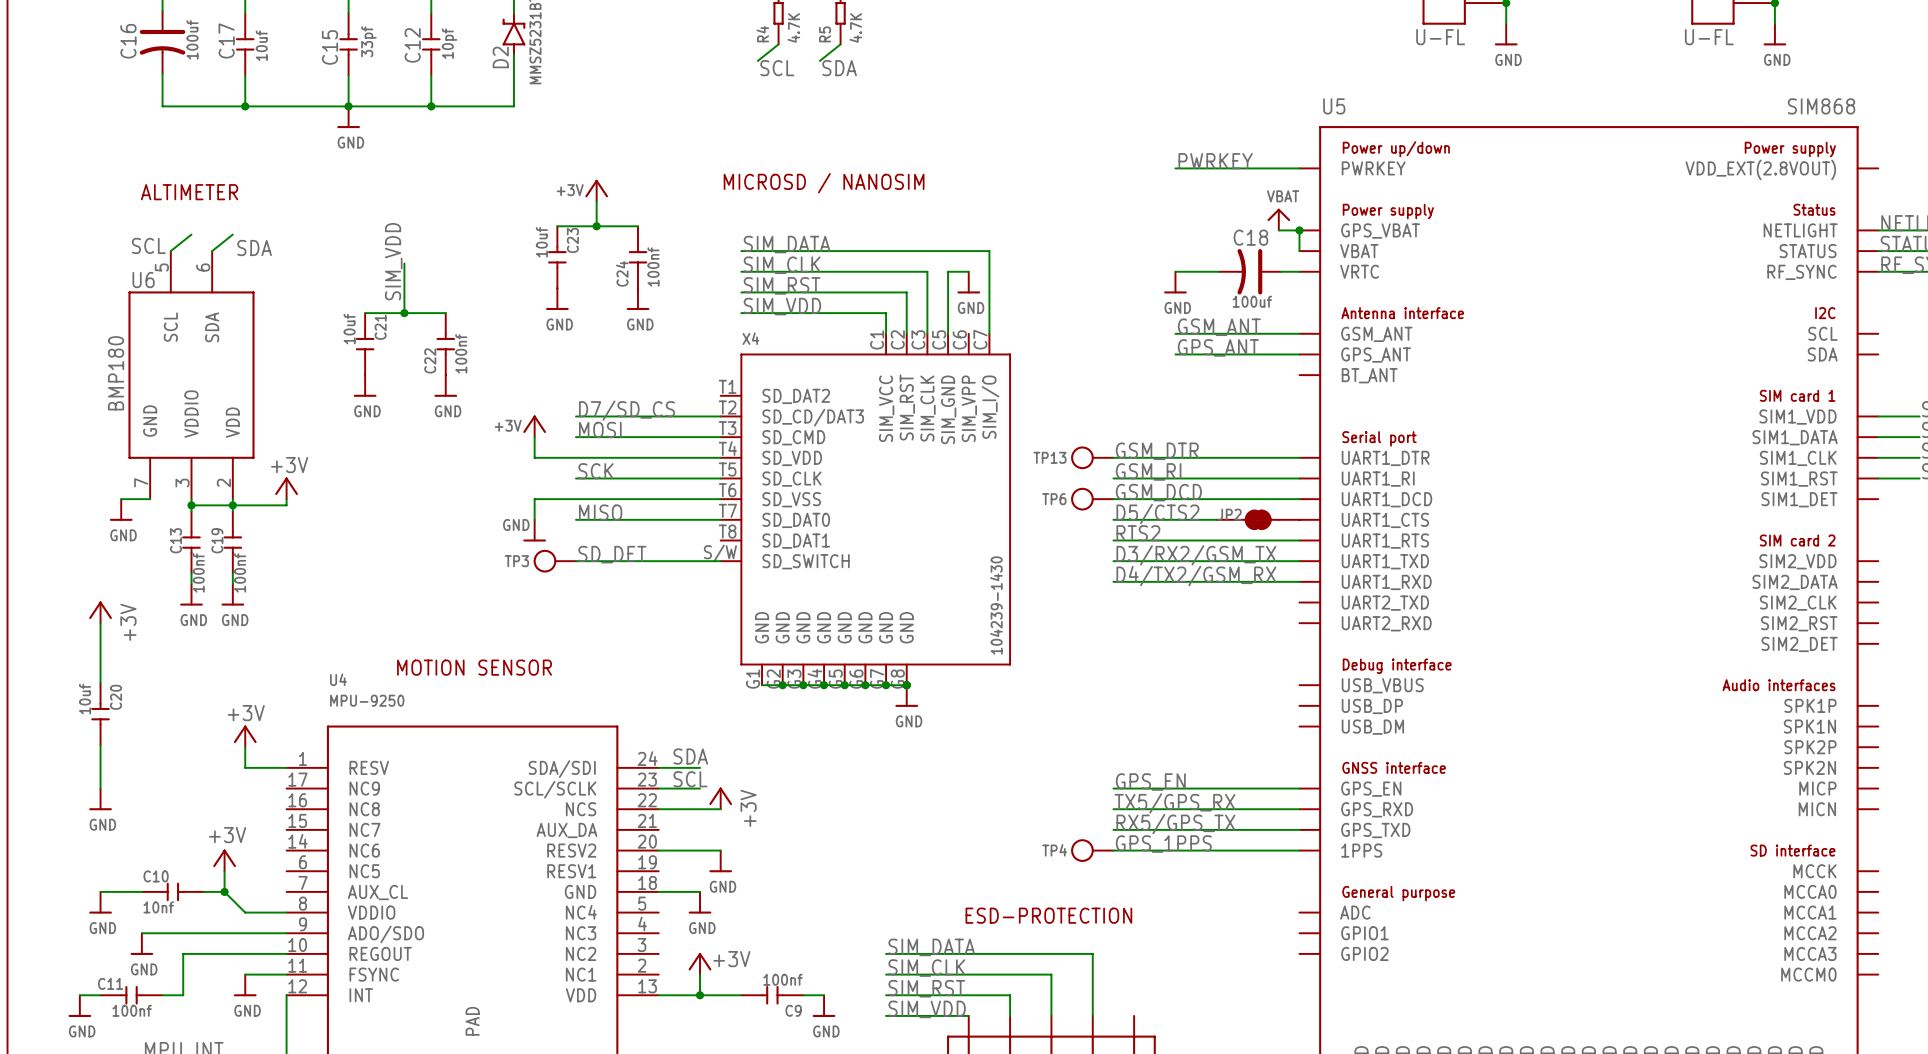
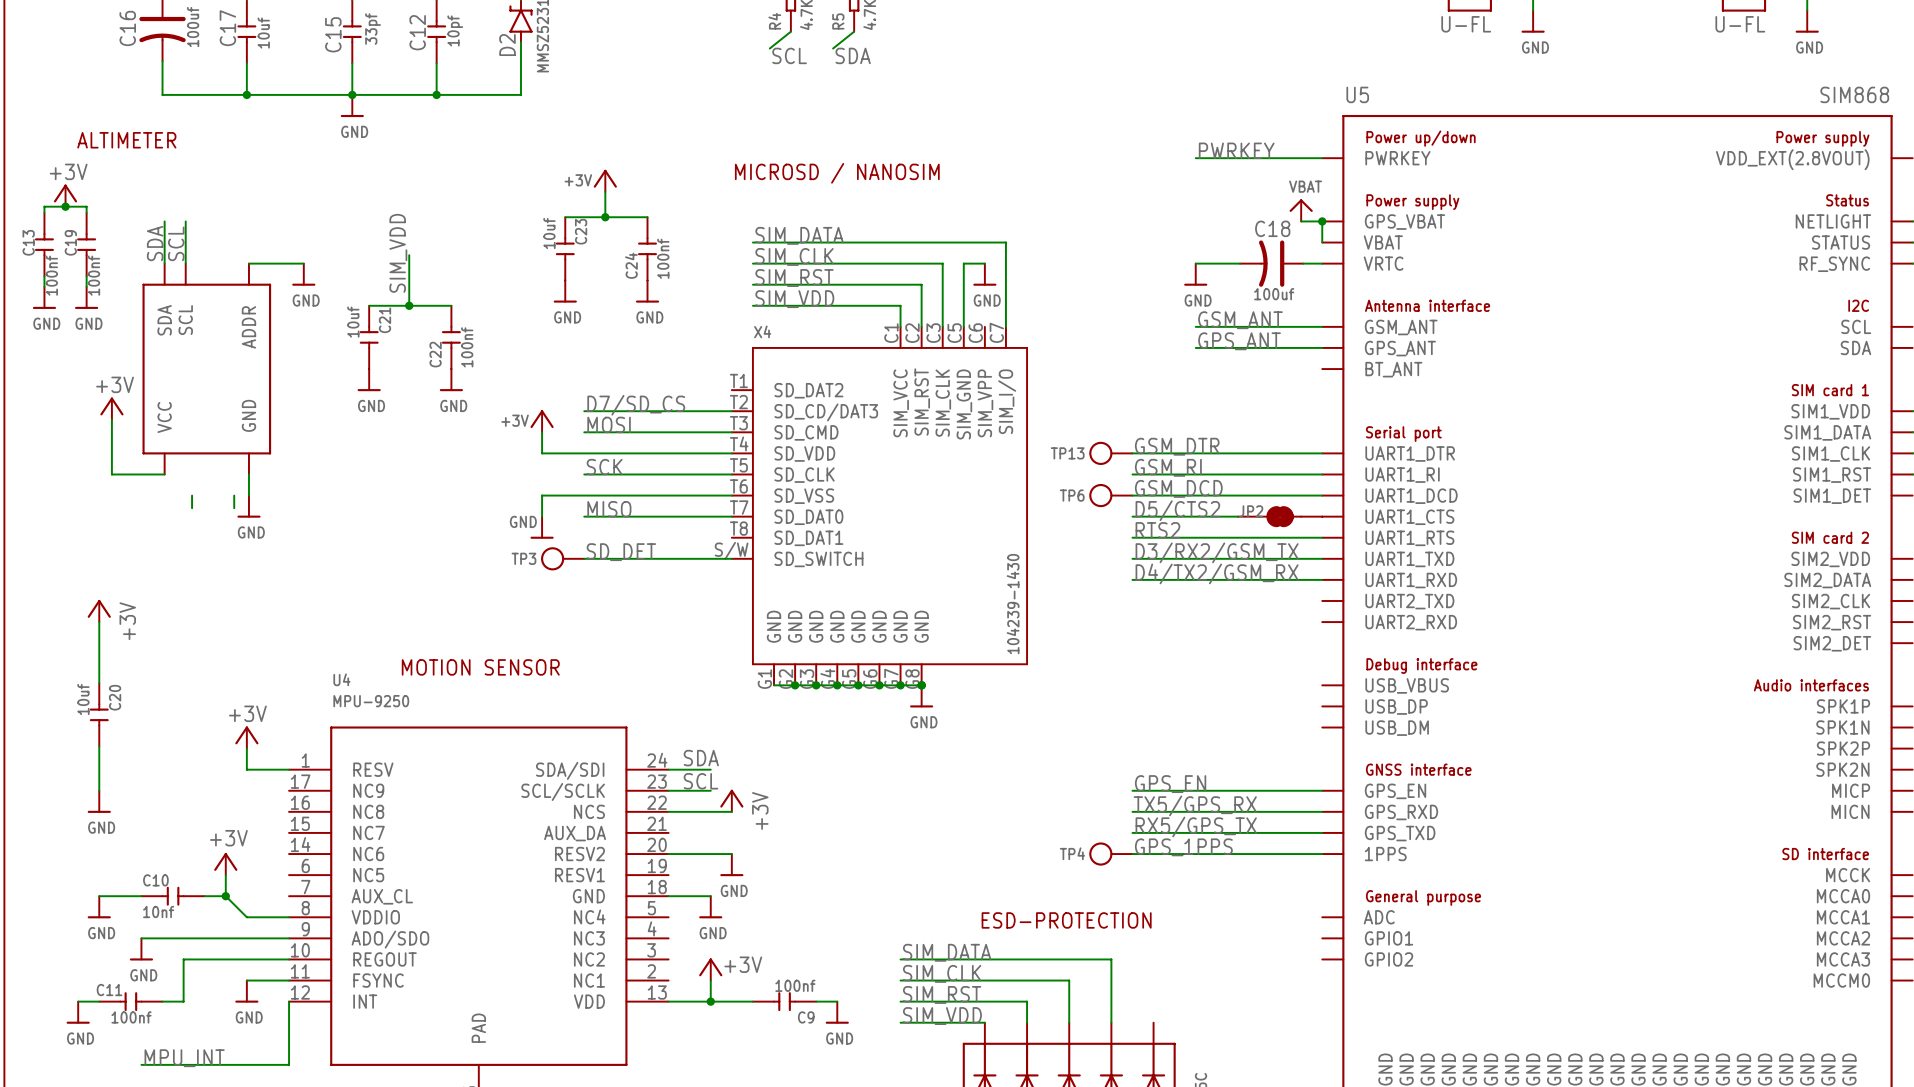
text position: ALTIMETER (189, 192) -> ALTIMETER (126, 140)
power symbol: none -> +3V (65, 195)
junction: none -> (65, 206)
wire: none -> (44, 213) (44, 206) (86, 206) (86, 213)
wire: none -> (164, 221) (164, 263)
wire: none -> (185, 221) (185, 263)
wire: (191, 234) (170, 251) -> none
wire: (232, 234) (212, 251) -> none
label rotation: 0° (148, 245) -> 90° counterclockwise (176, 243)
label rotation: 0° (254, 247) -> 90° counterclockwise (155, 243)
label position: SDA (254, 247) -> SDA (155, 243)
wire: none -> (248, 263) (303, 263)
power symbol: none -> GND (303, 274)
wire: none -> (44, 276) (44, 286)
wire: none -> (86, 276) (86, 286)
power symbol: none -> GND (44, 297)
power symbol: none -> GND (86, 297)
U6: BMP180 (191, 375) -> none
part: none -> (206, 369)
power symbol: none -> +3V (111, 408)
wire: none -> (111, 419) (111, 474) (164, 474)
wire: none -> (248, 474) (248, 495)
power symbol: +3V (286, 488) -> none
wire: (121, 499) (150, 499) -> none
wire: (286, 499) (286, 505) (191, 505) -> none
junction: (191, 505) -> none
junction: (232, 505) -> none
power symbol: GND (121, 510) -> none
power symbol: none -> GND (248, 506)
C13 position: (191, 542) -> (44, 244)
C19 position: (232, 542) -> (86, 244)
wire: (191, 573) (191, 583) -> none
wire: (232, 573) (232, 583) -> none
power symbol: GND (191, 594) -> none
power symbol: GND (232, 594) -> none

